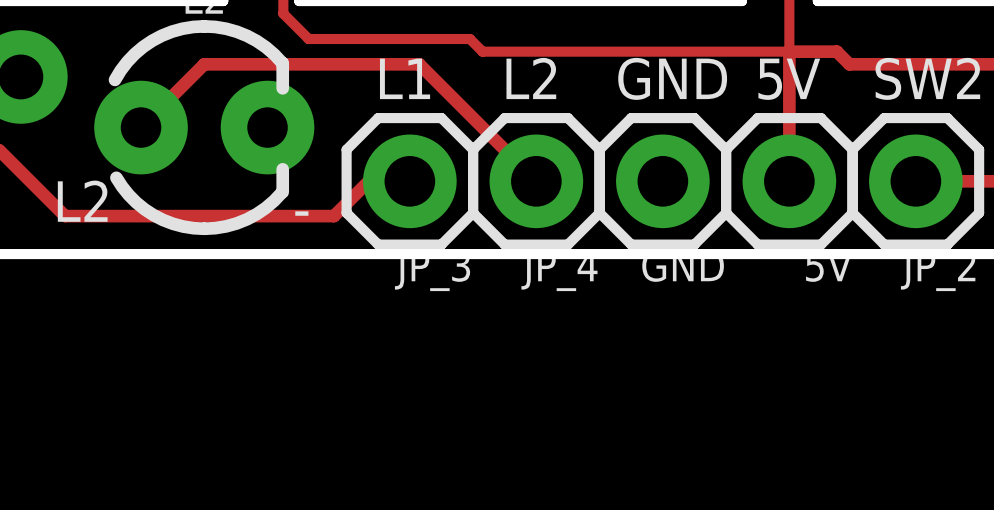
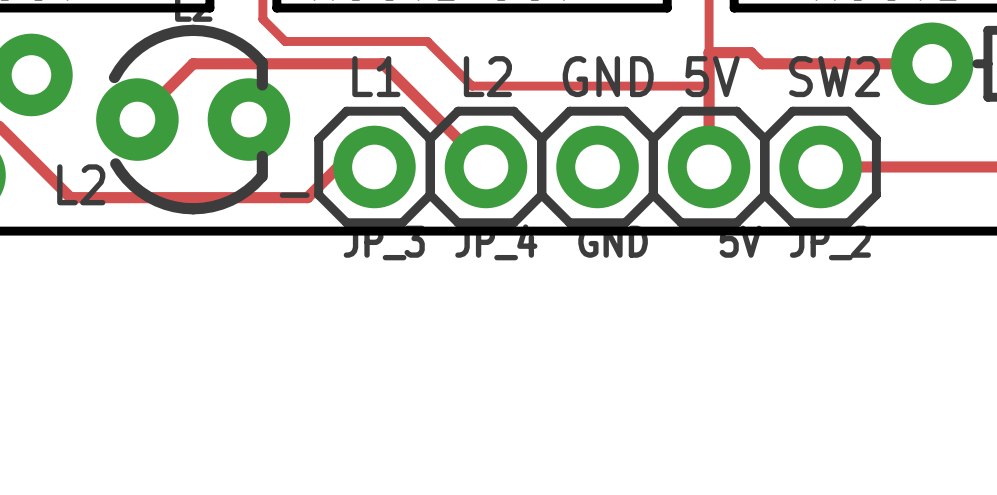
track: (482, 51) (786, 51) -> (438, 52) (472, 86) (706, 86)

